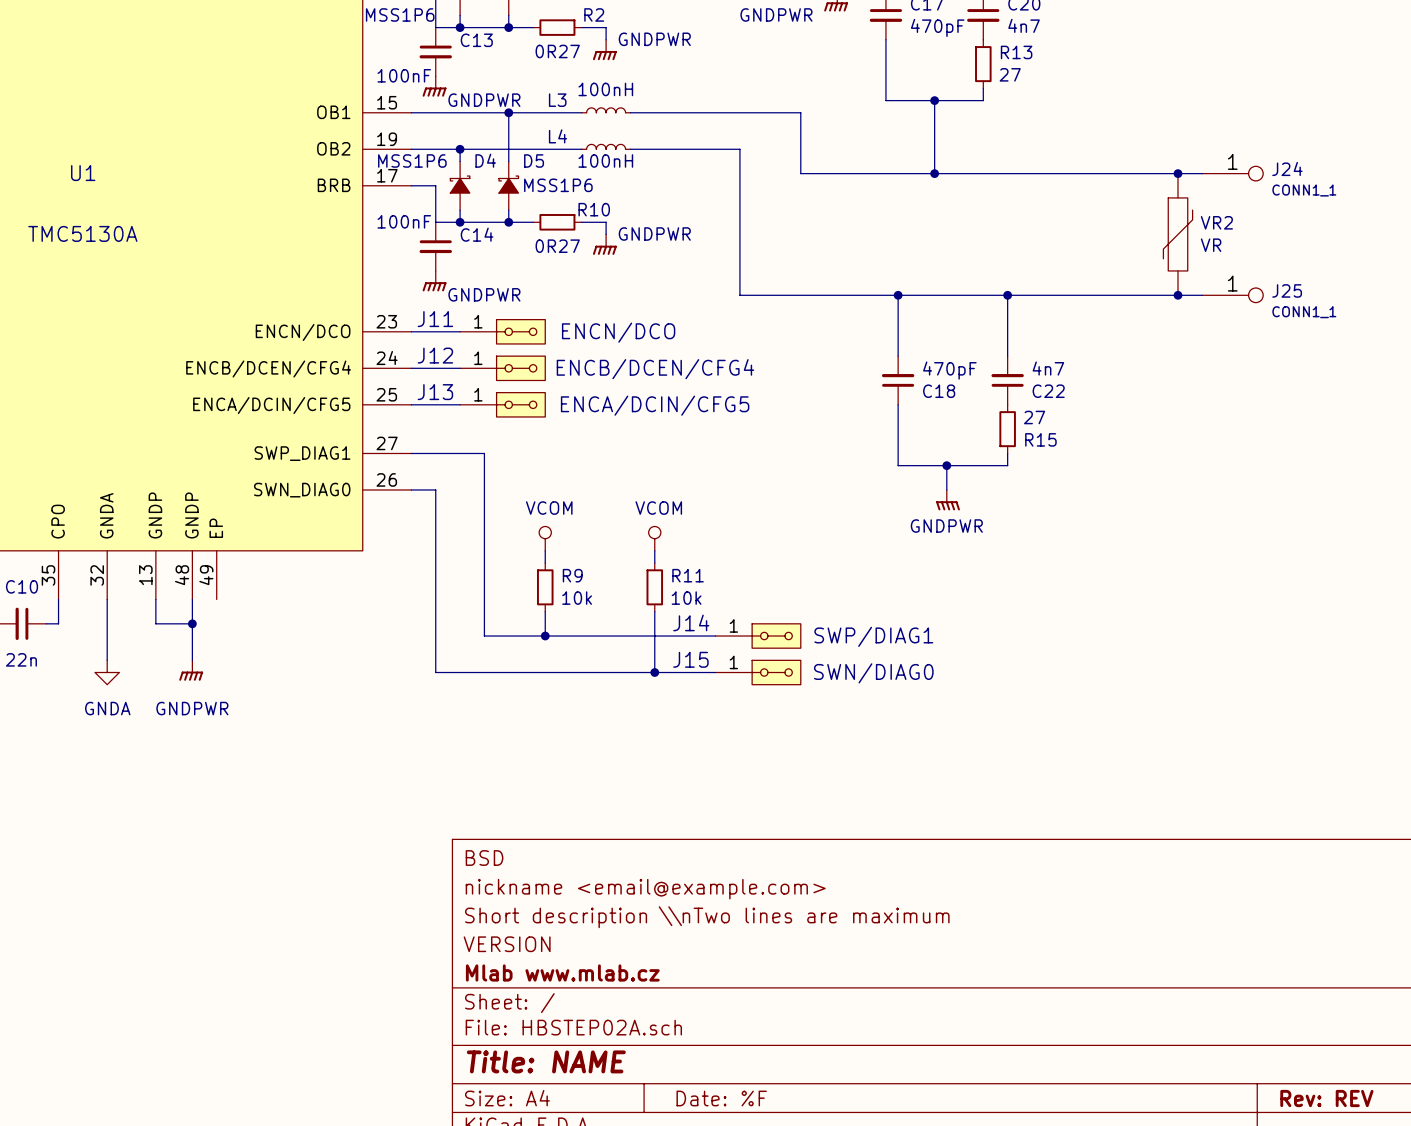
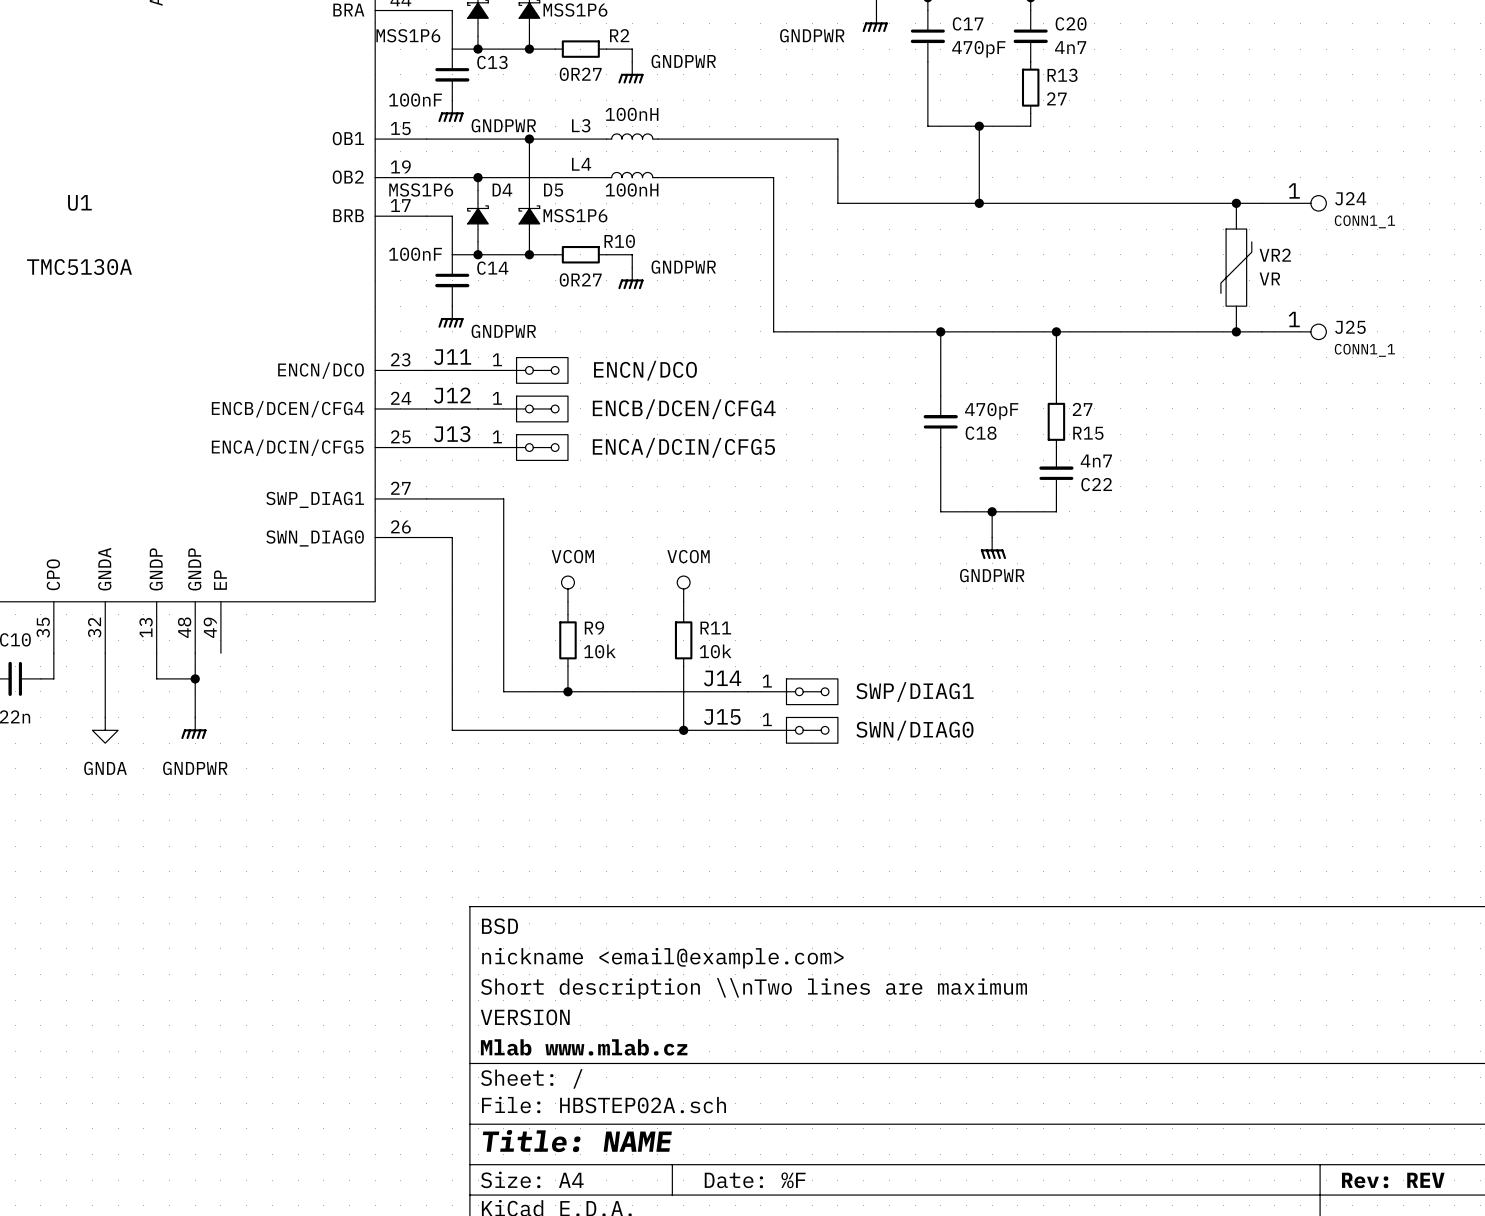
C22 position: (1007, 380) -> (1056, 473)
R15 position: (1007, 429) -> (1056, 421)

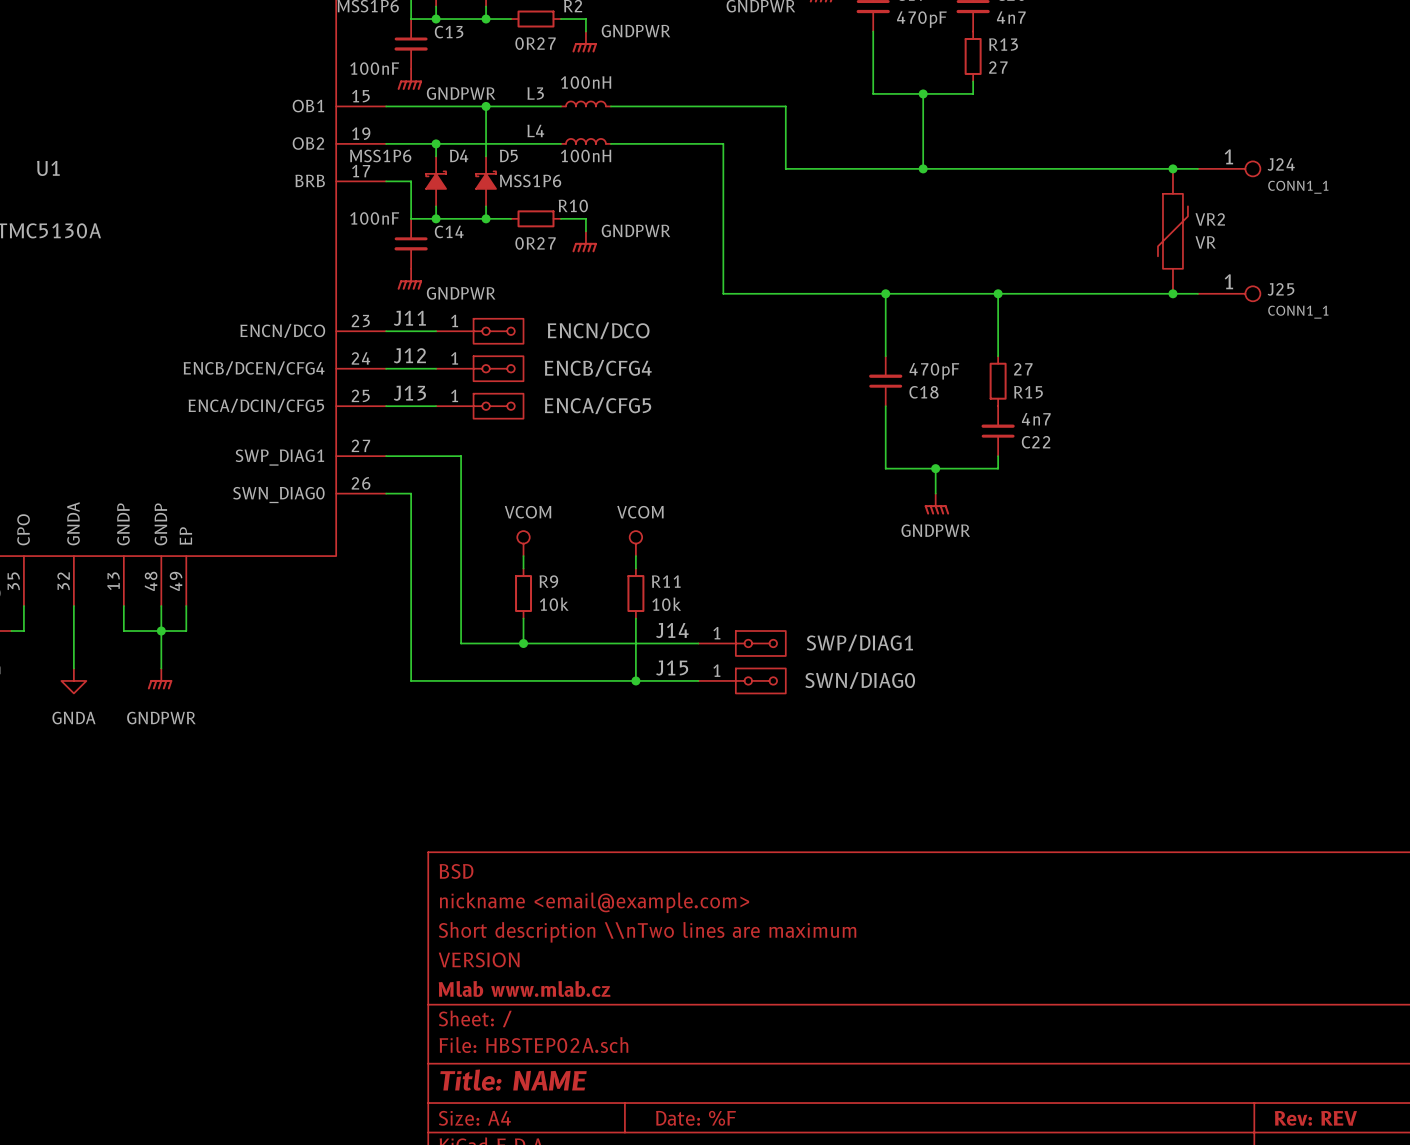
J12 value: ENCB/DCEN/CFG4 (684, 409) -> ENCB/CFG4 (598, 368)
J13 value: ENCA/DCIN/CFG5 (683, 447) -> ENCA/CFG5 (598, 405)
wire: none -> (186, 606) (186, 631) (161, 631)

